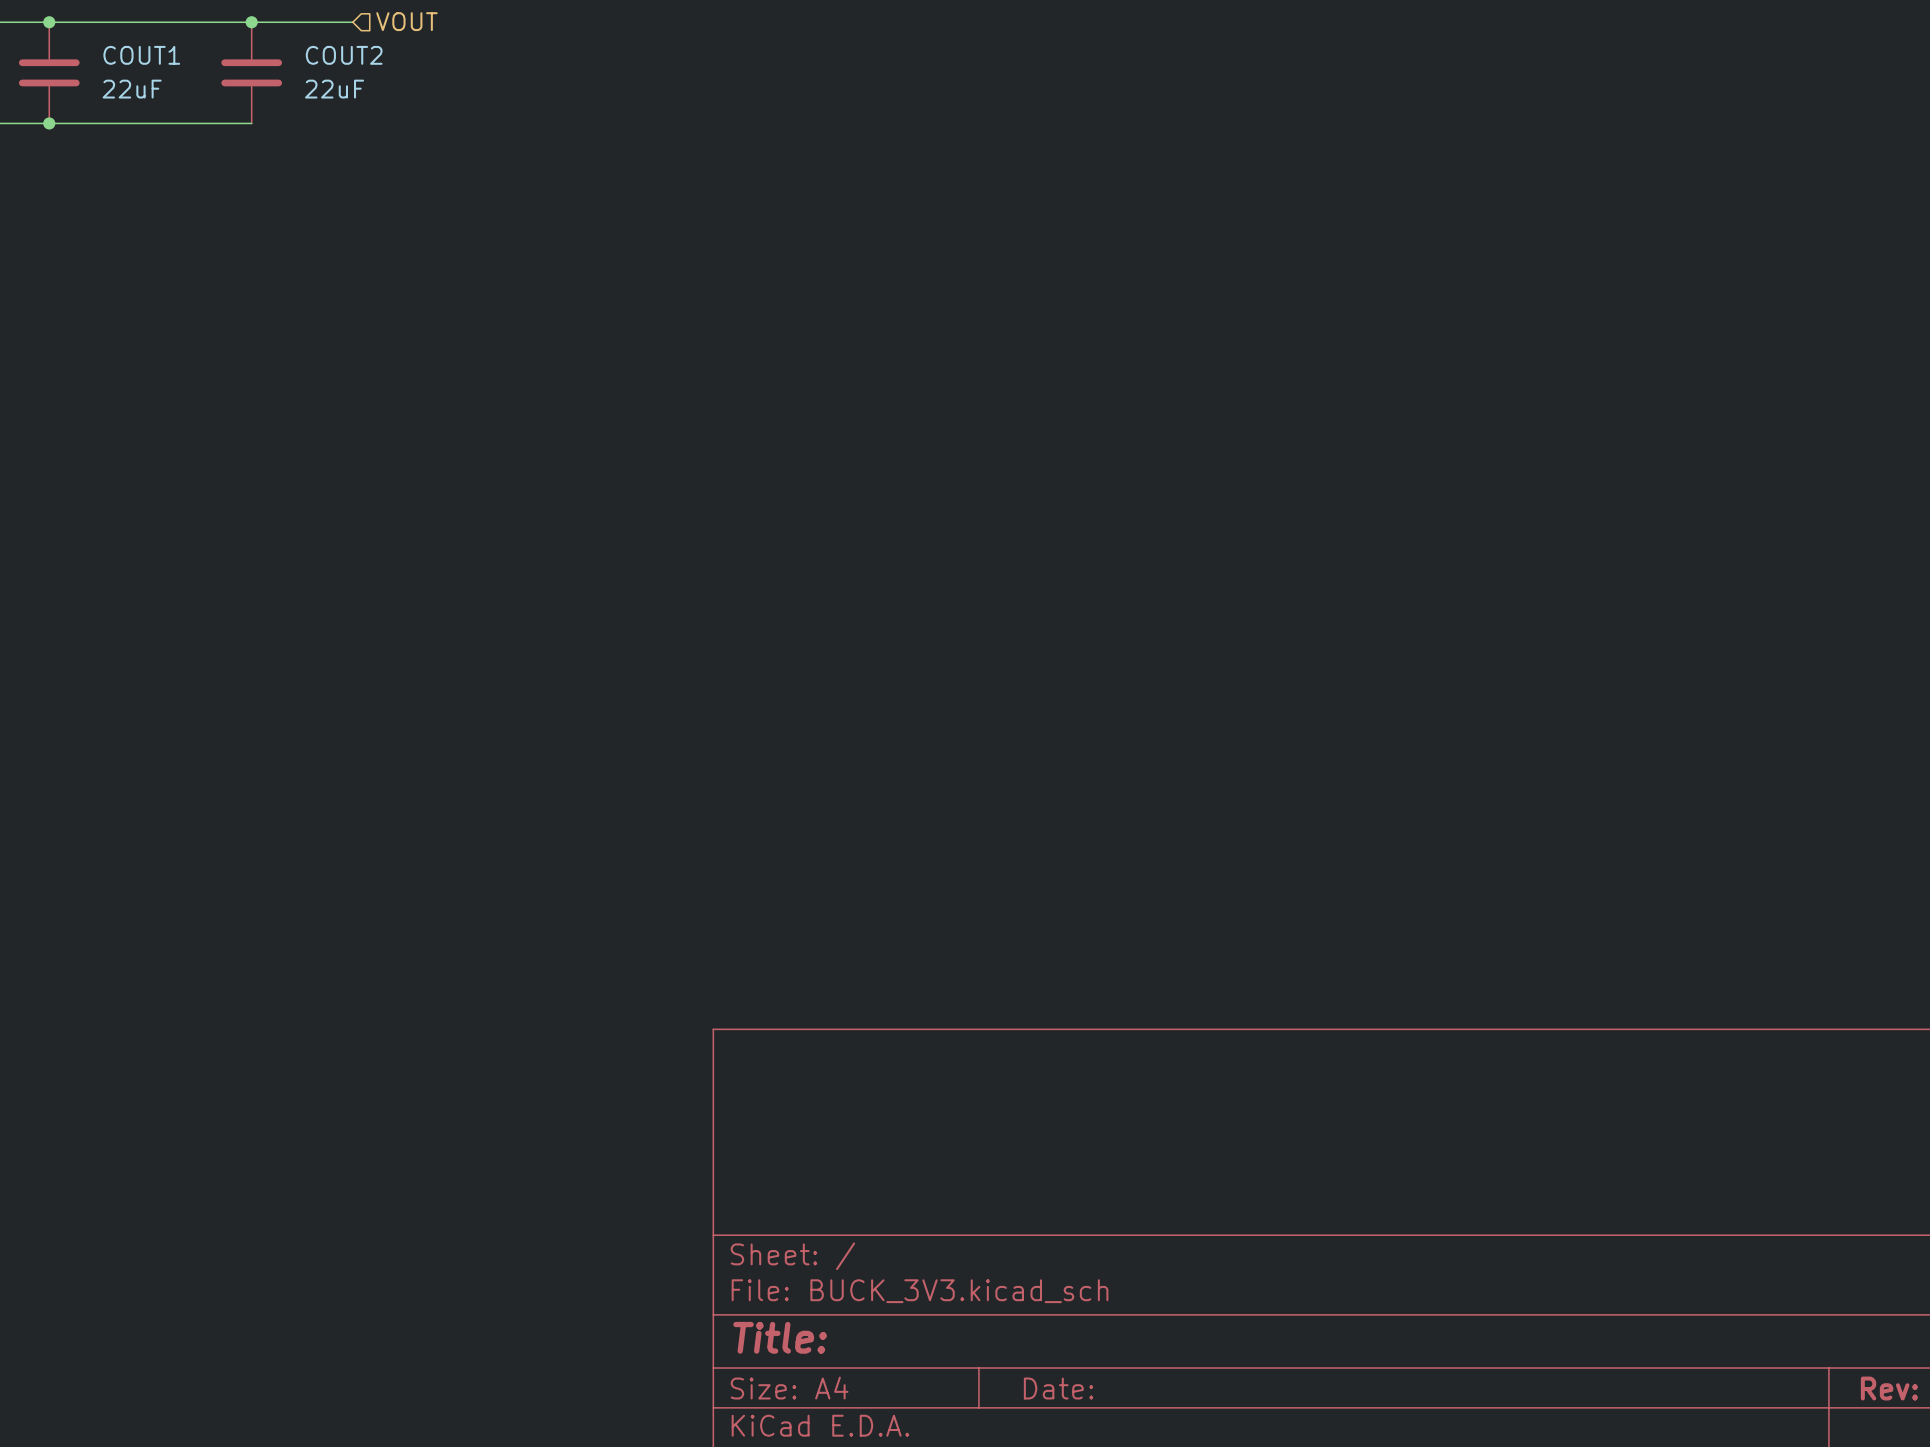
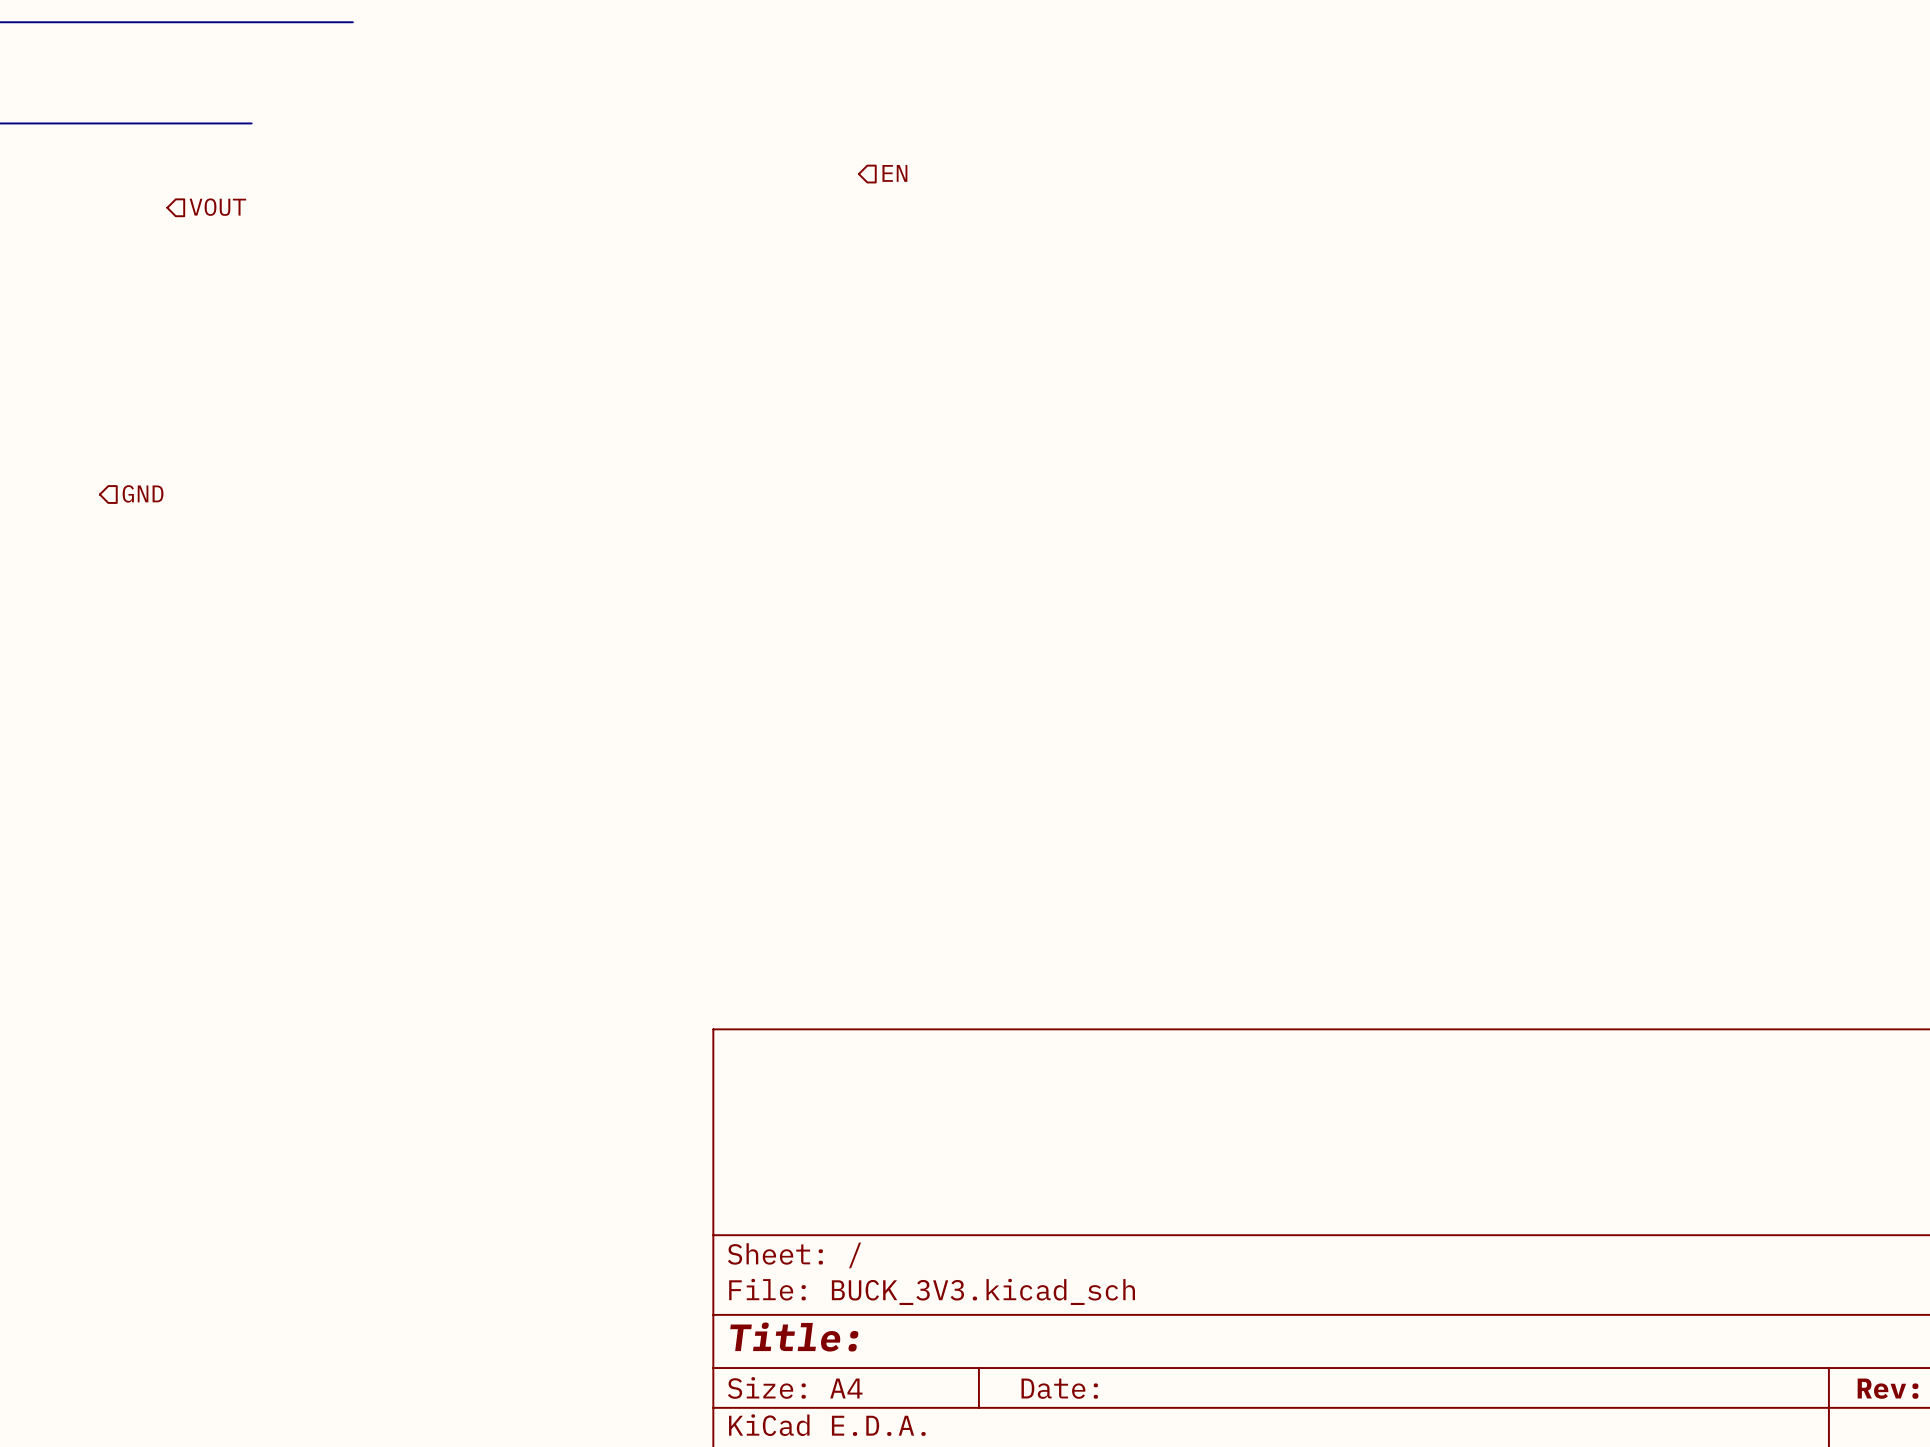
hierarchical label position: VOUT (406, 21) -> VOUT (217, 207)
junction: (49, 22) -> none
junction: (251, 22) -> none
COUT1: 22uF (49, 72) -> none
COUT2: 22uF (251, 72) -> none
junction: (49, 123) -> none
hierarchical label: none -> EN (894, 173)
hierarchical label: none -> GND (143, 493)

